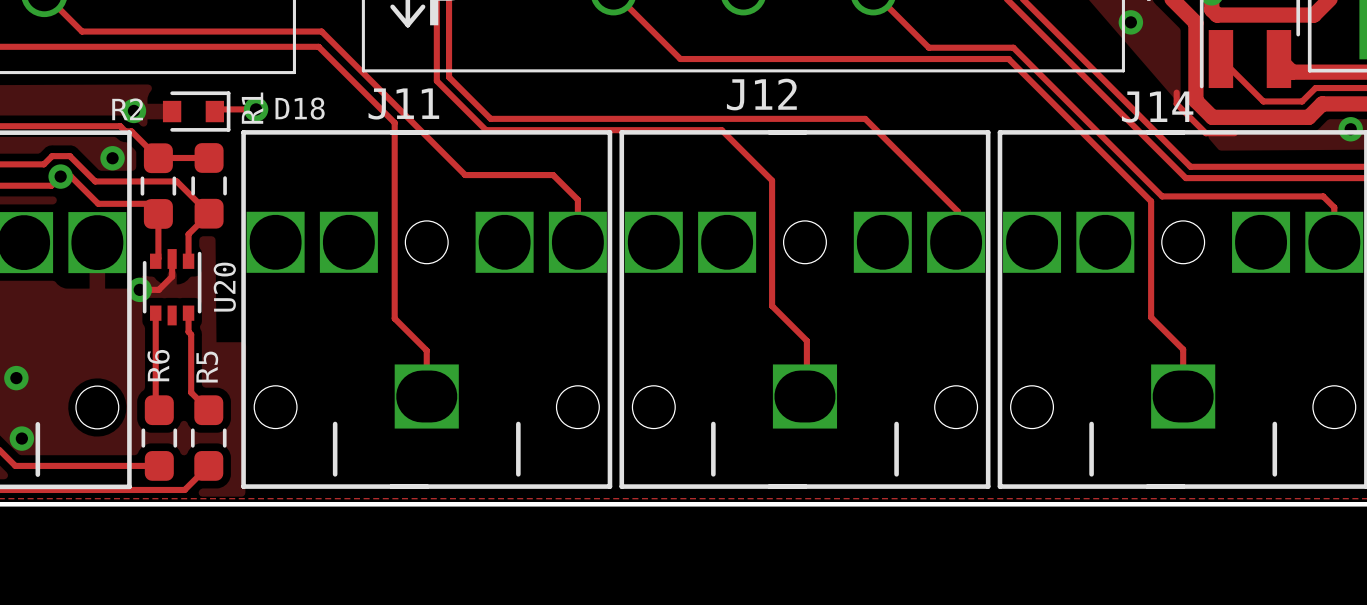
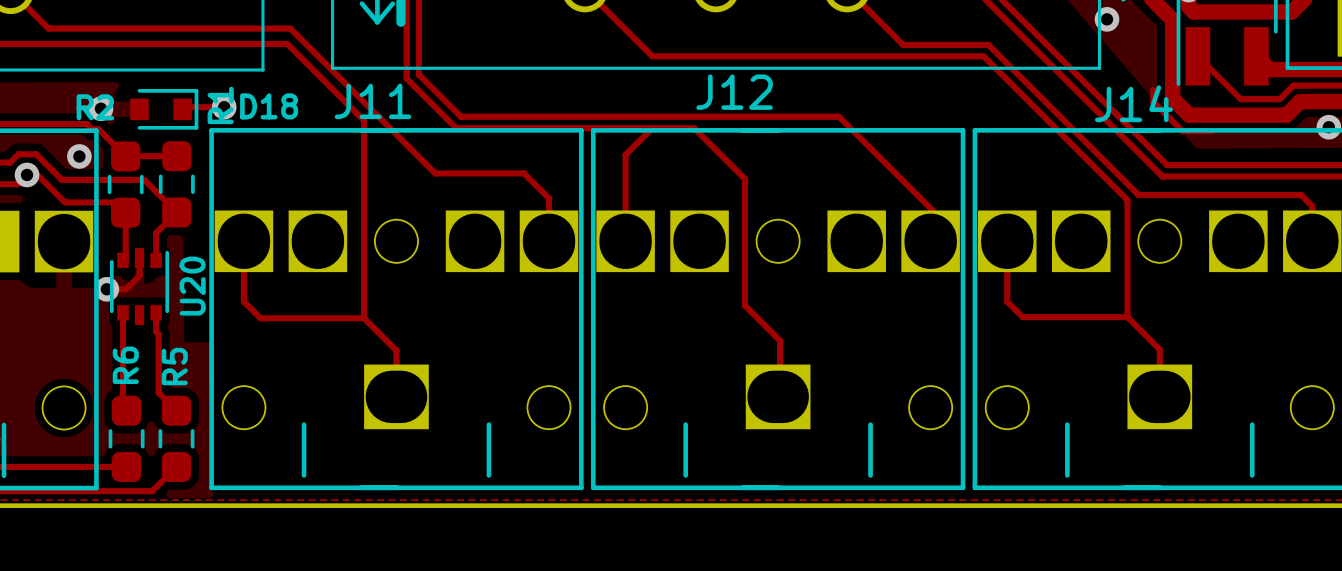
track: none -> (652, 128) (625, 154) (625, 241)
track: none -> (243, 241) (243, 301) (260, 318) (364, 318)
track: none -> (1007, 241) (1007, 301) (1022, 317) (1127, 317)

